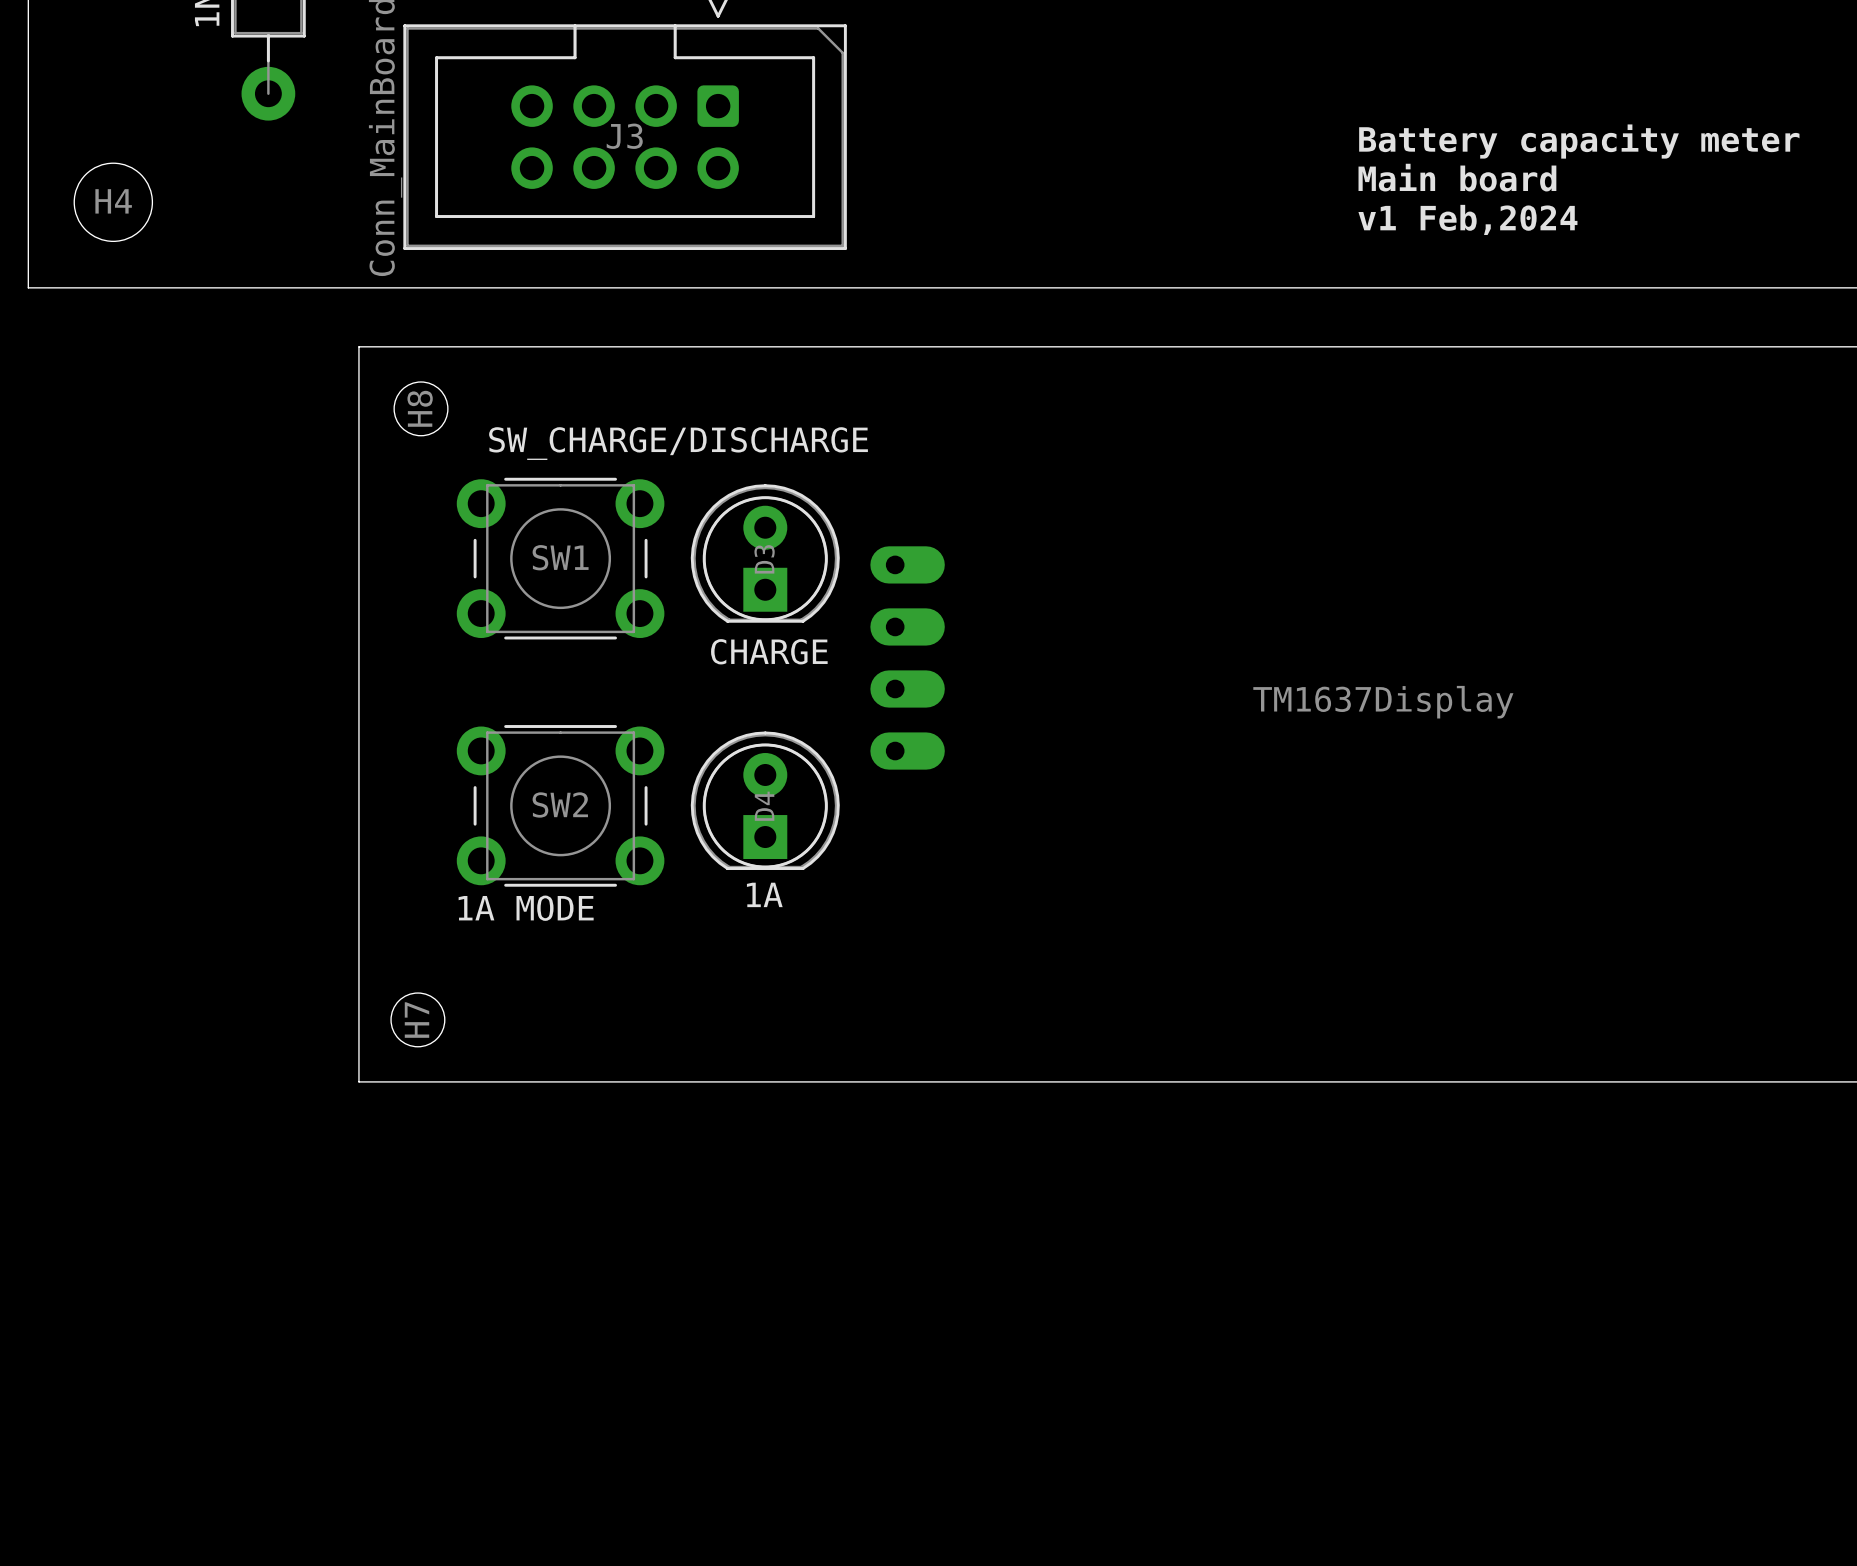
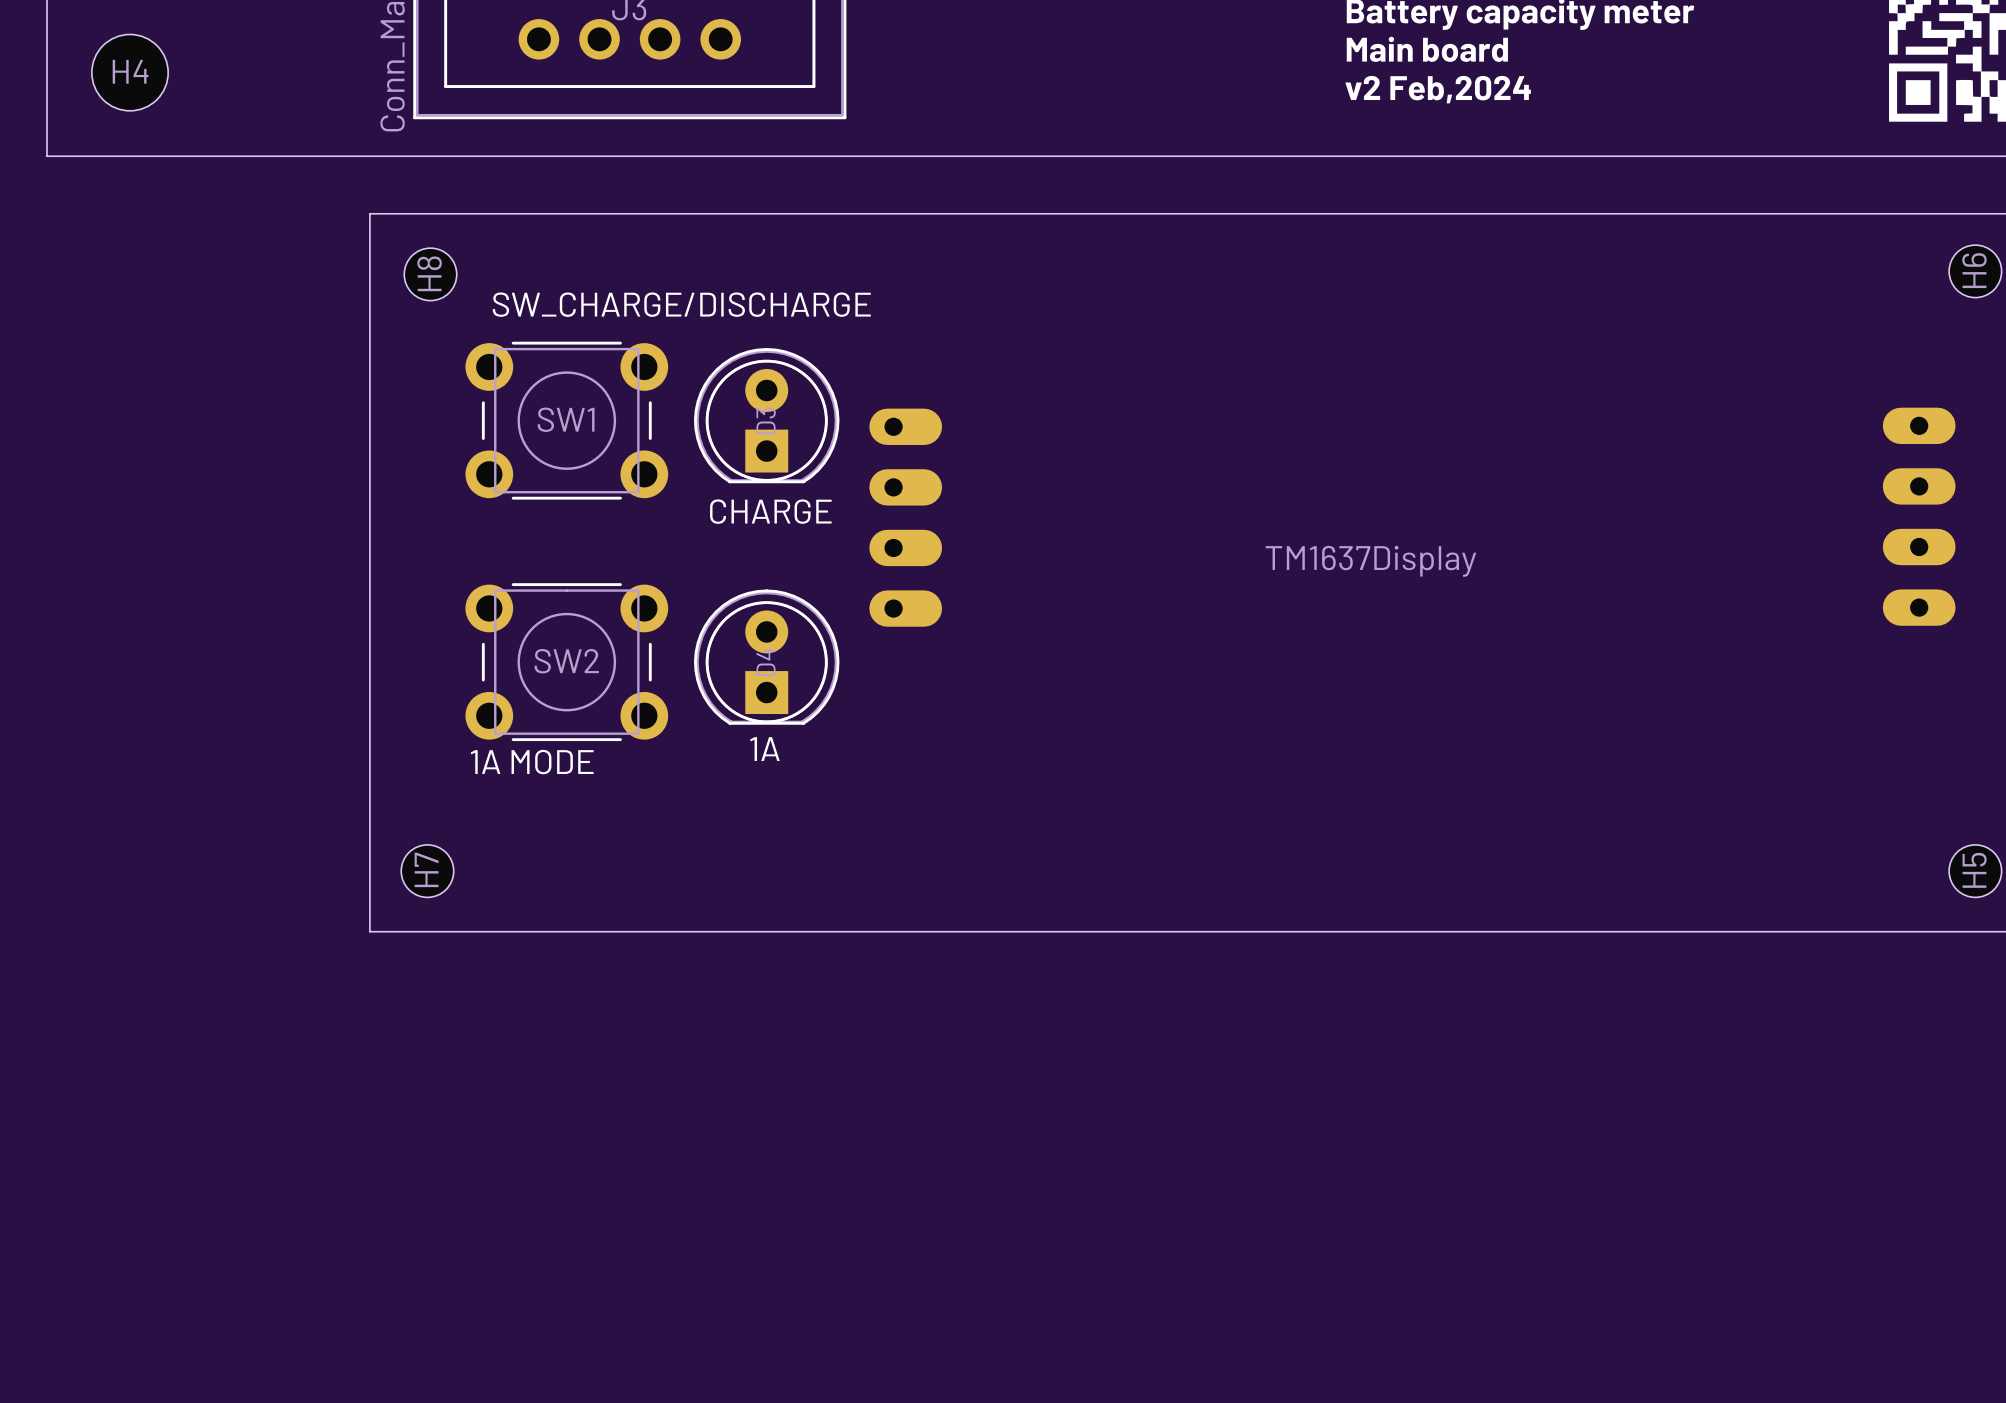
text: v1 Feb,2024 (1467, 219) -> v2 Feb,2024 (1438, 89)

